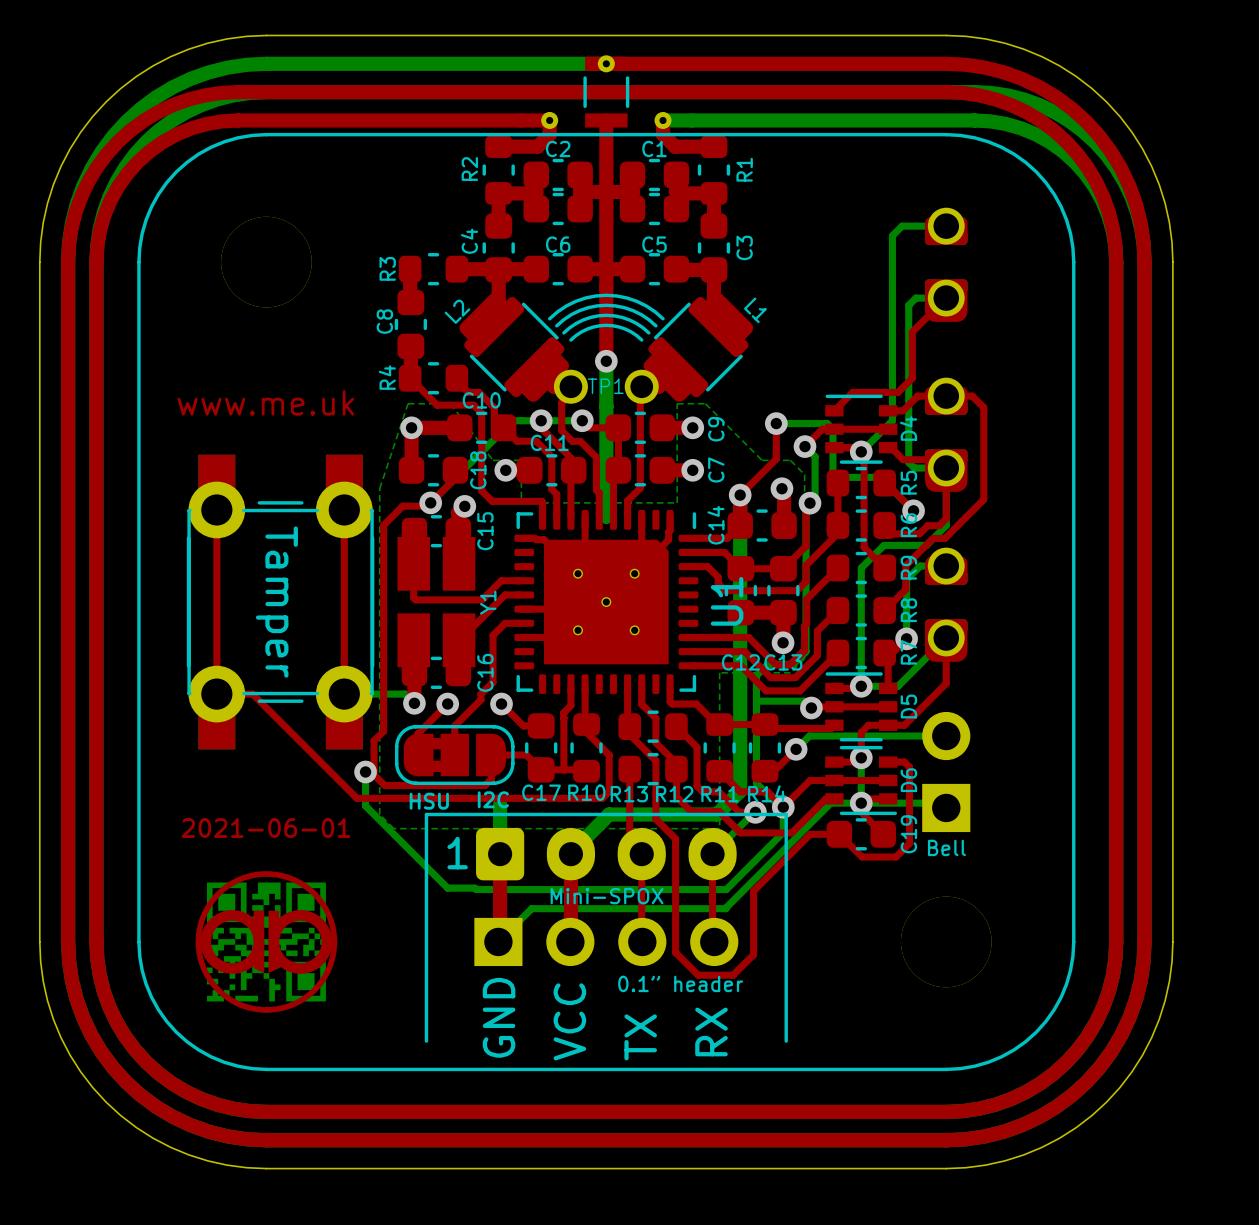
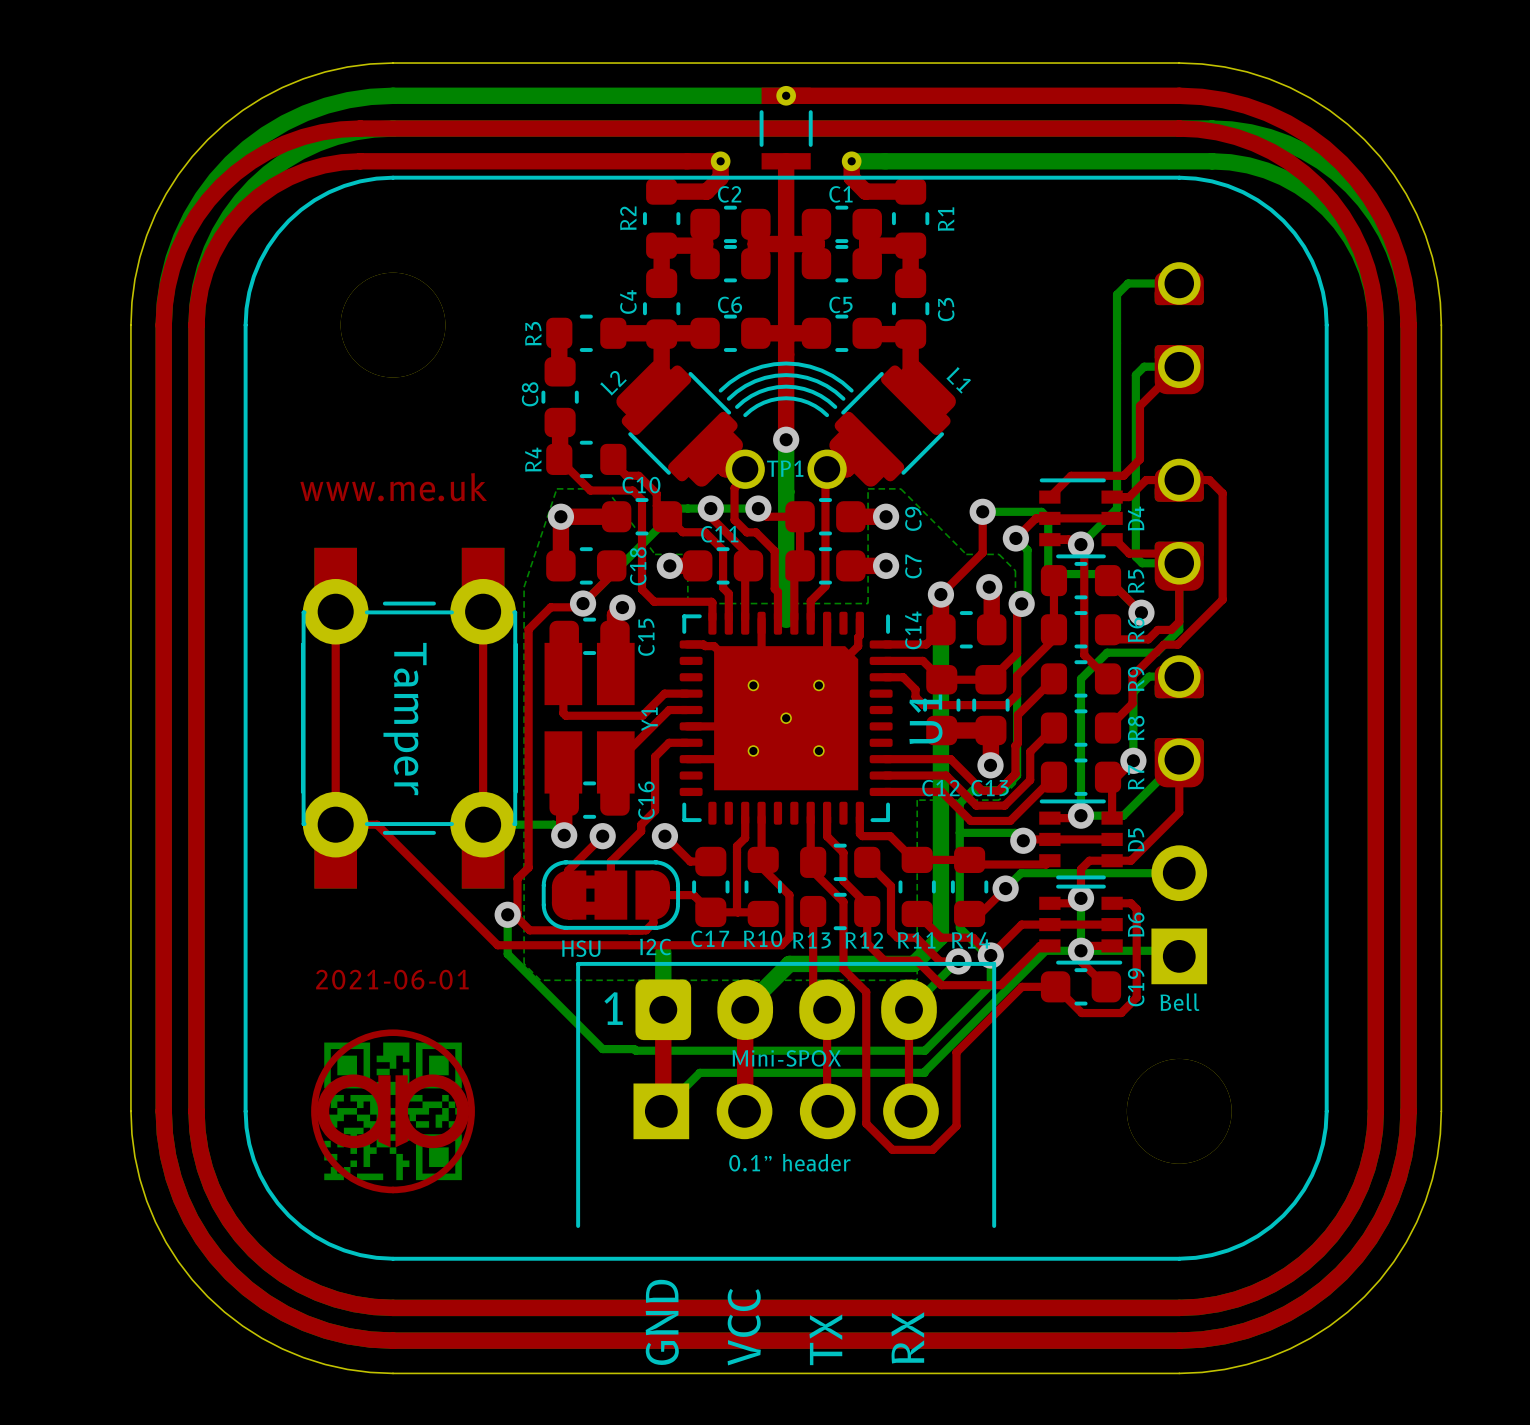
text position: 0.1” header (680, 983) -> 0.1” header (789, 1162)
text position: GND (499, 1017) -> GND (662, 1322)
text position: VCC (569, 1021) -> VCC (744, 1327)
text position: RX (711, 1031) -> RX (907, 1337)
text position: TX (640, 1037) -> TX (825, 1339)

